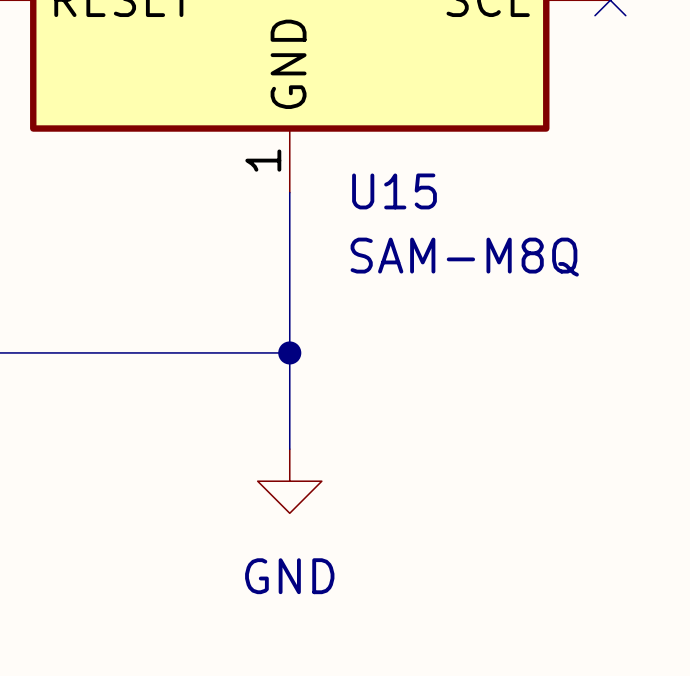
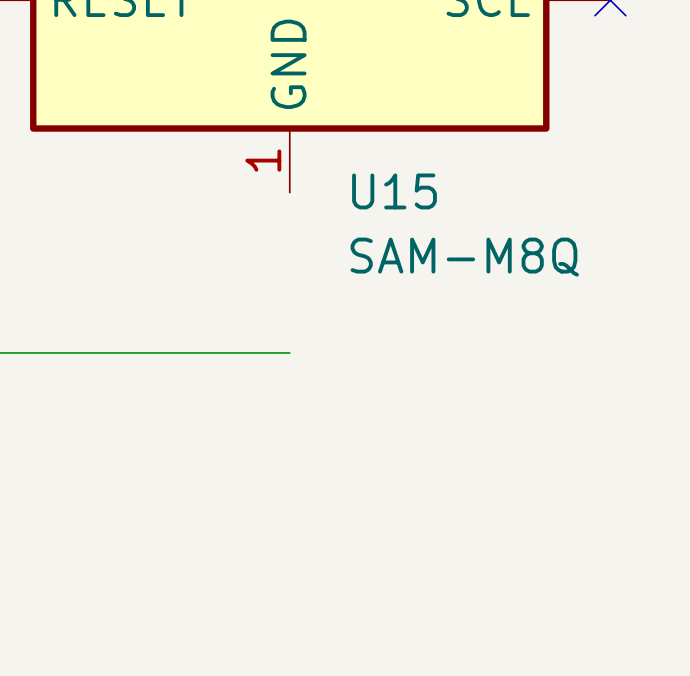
wire: (289, 192) (289, 449) -> none
junction: (289, 352) -> none
power symbol: GND (289, 481) -> none

